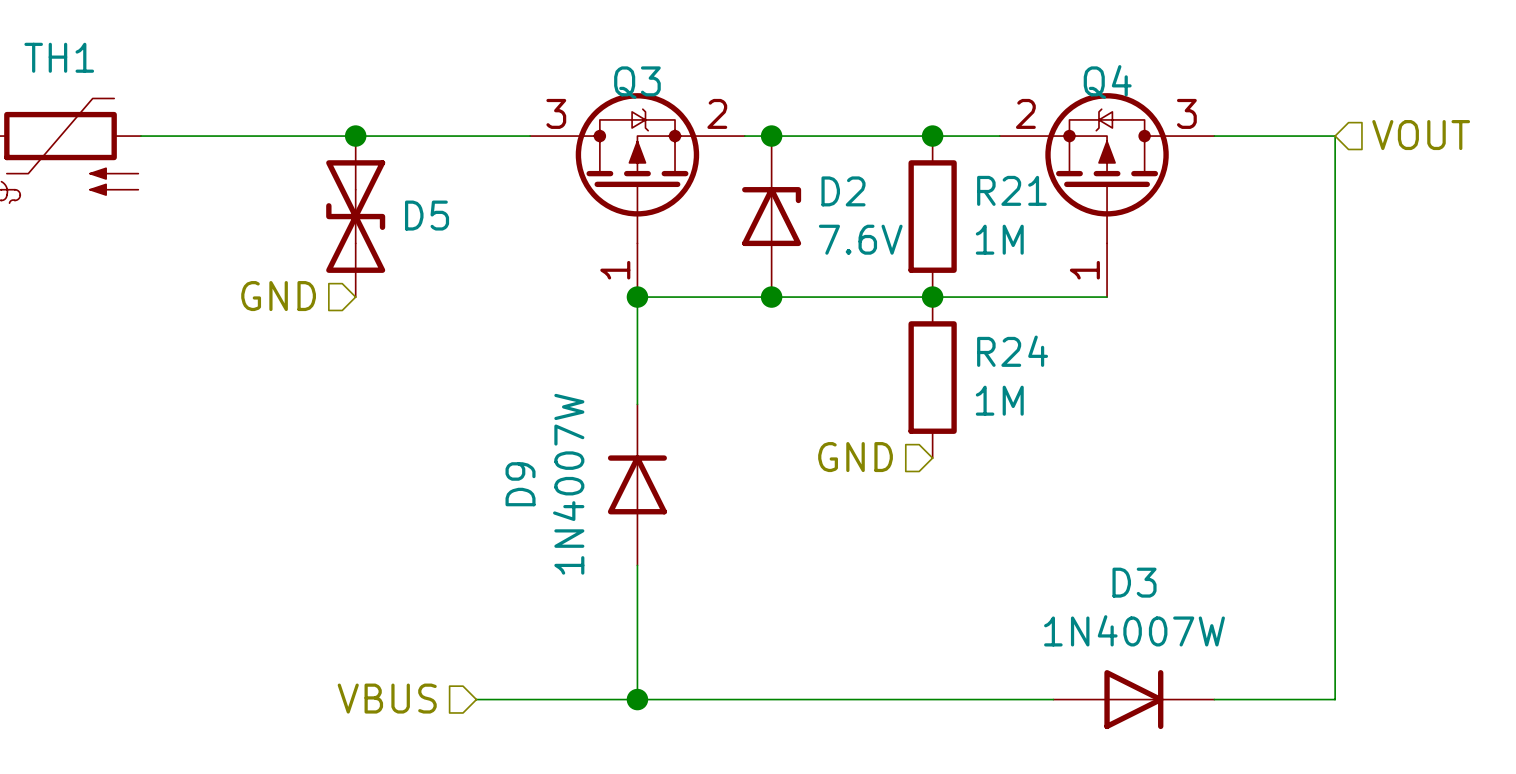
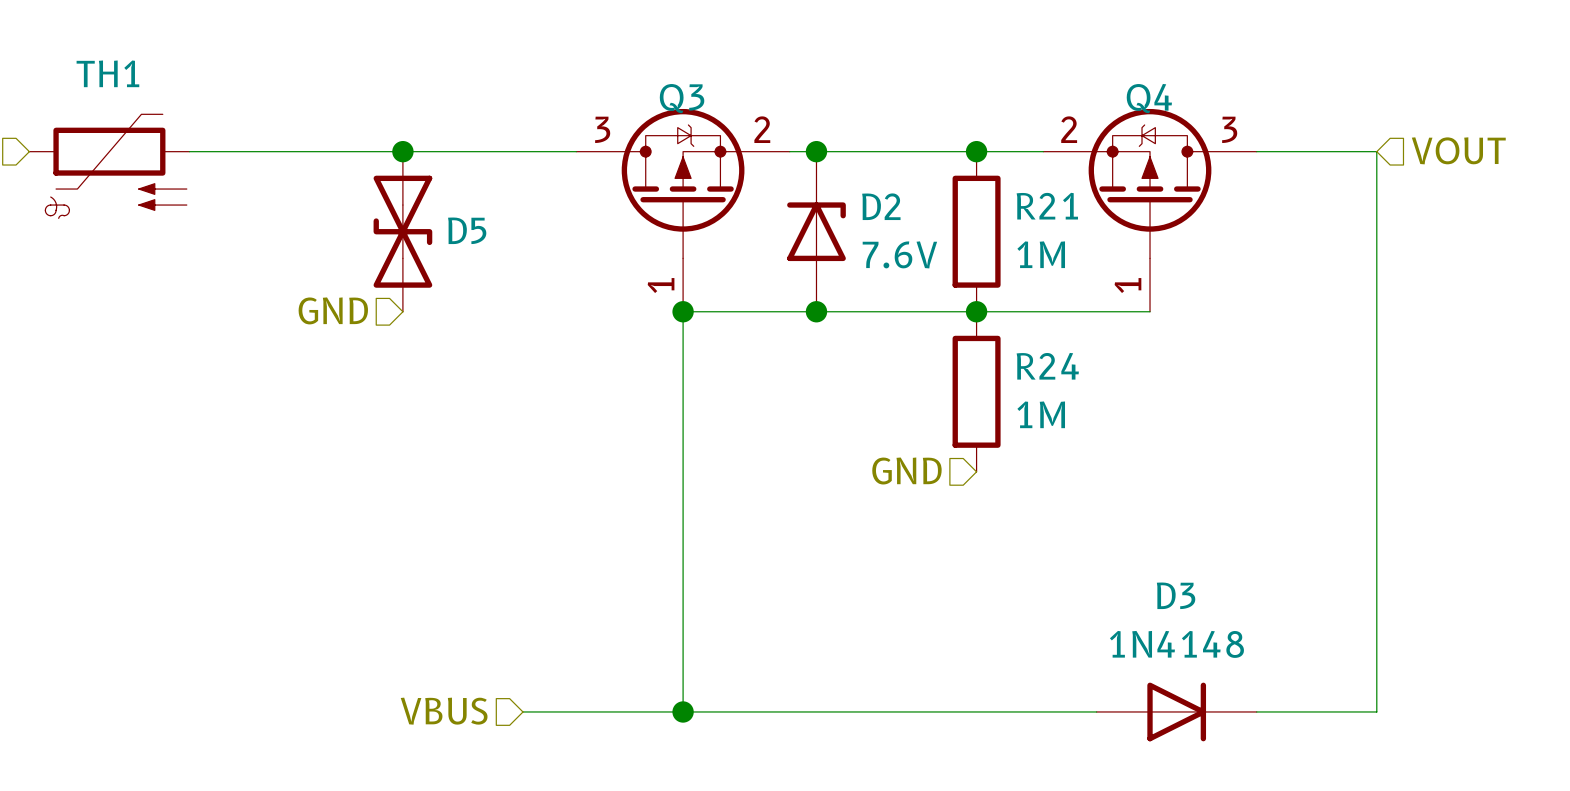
D9: 1N4007W (637, 484) -> none
D3 value: 1N4007W (1134, 630) -> 1N4148 (1176, 644)

